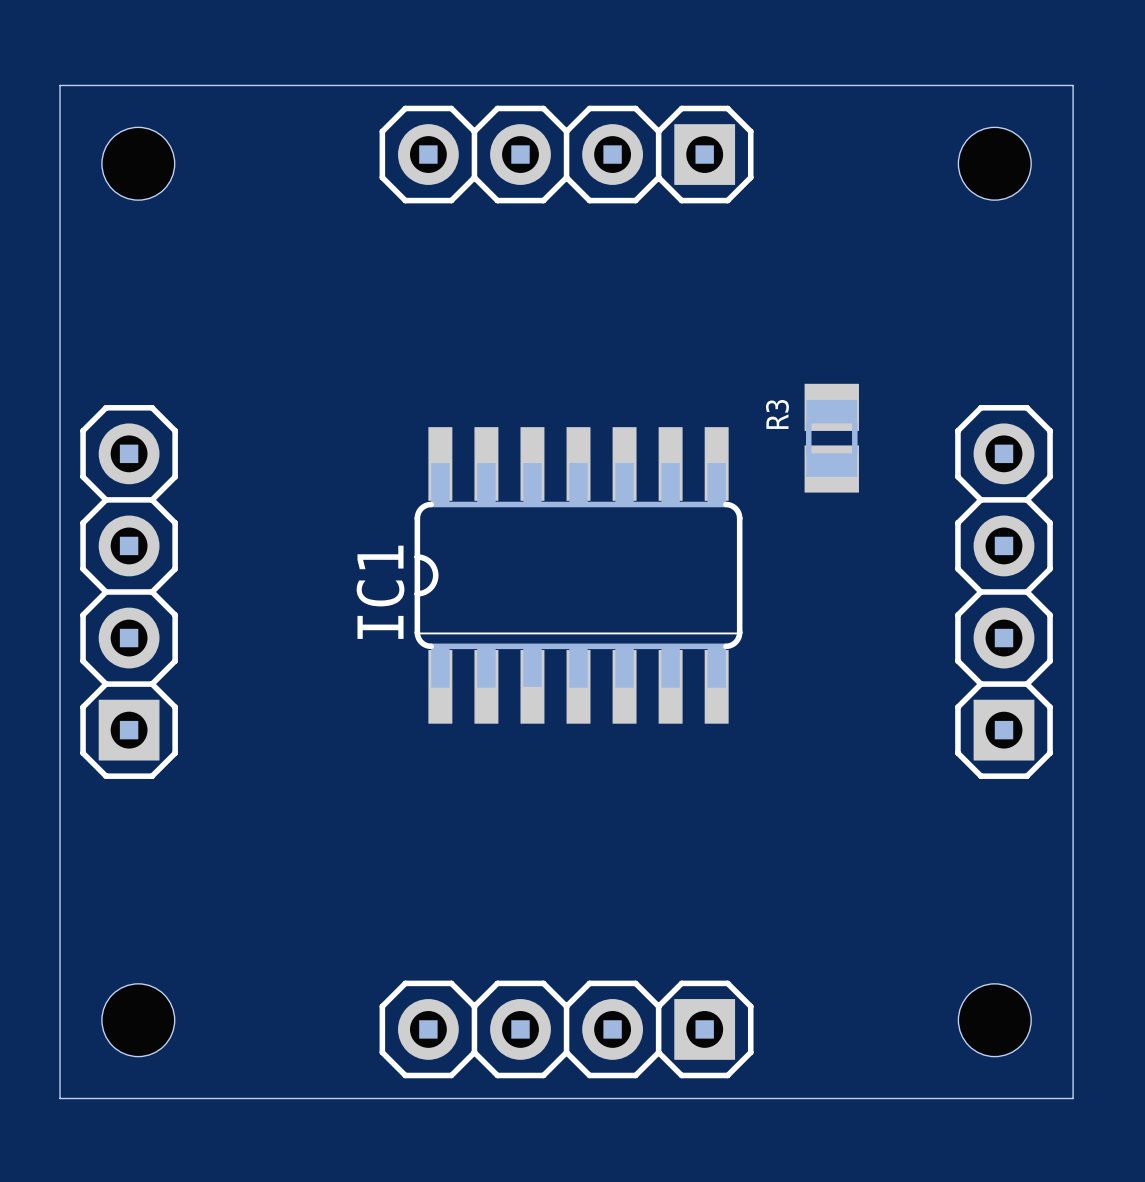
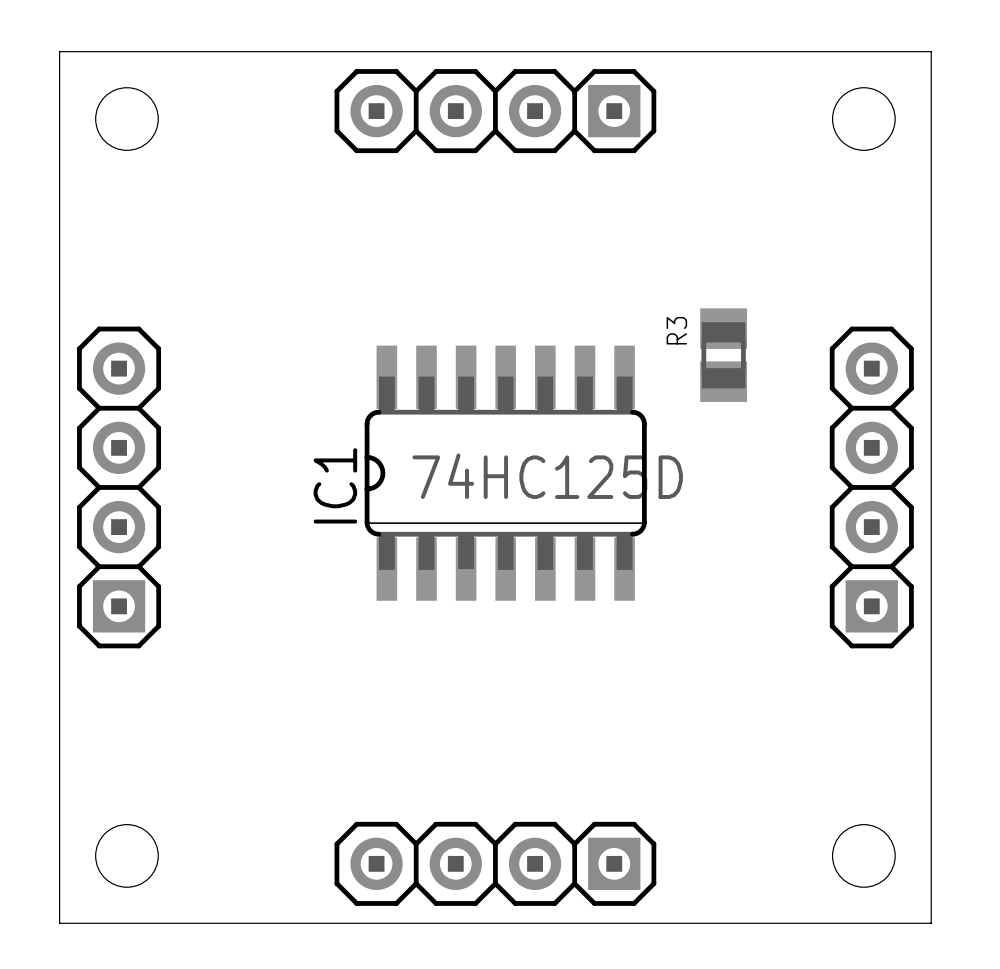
IC1 value: none -> 74HC125D (547, 476)

